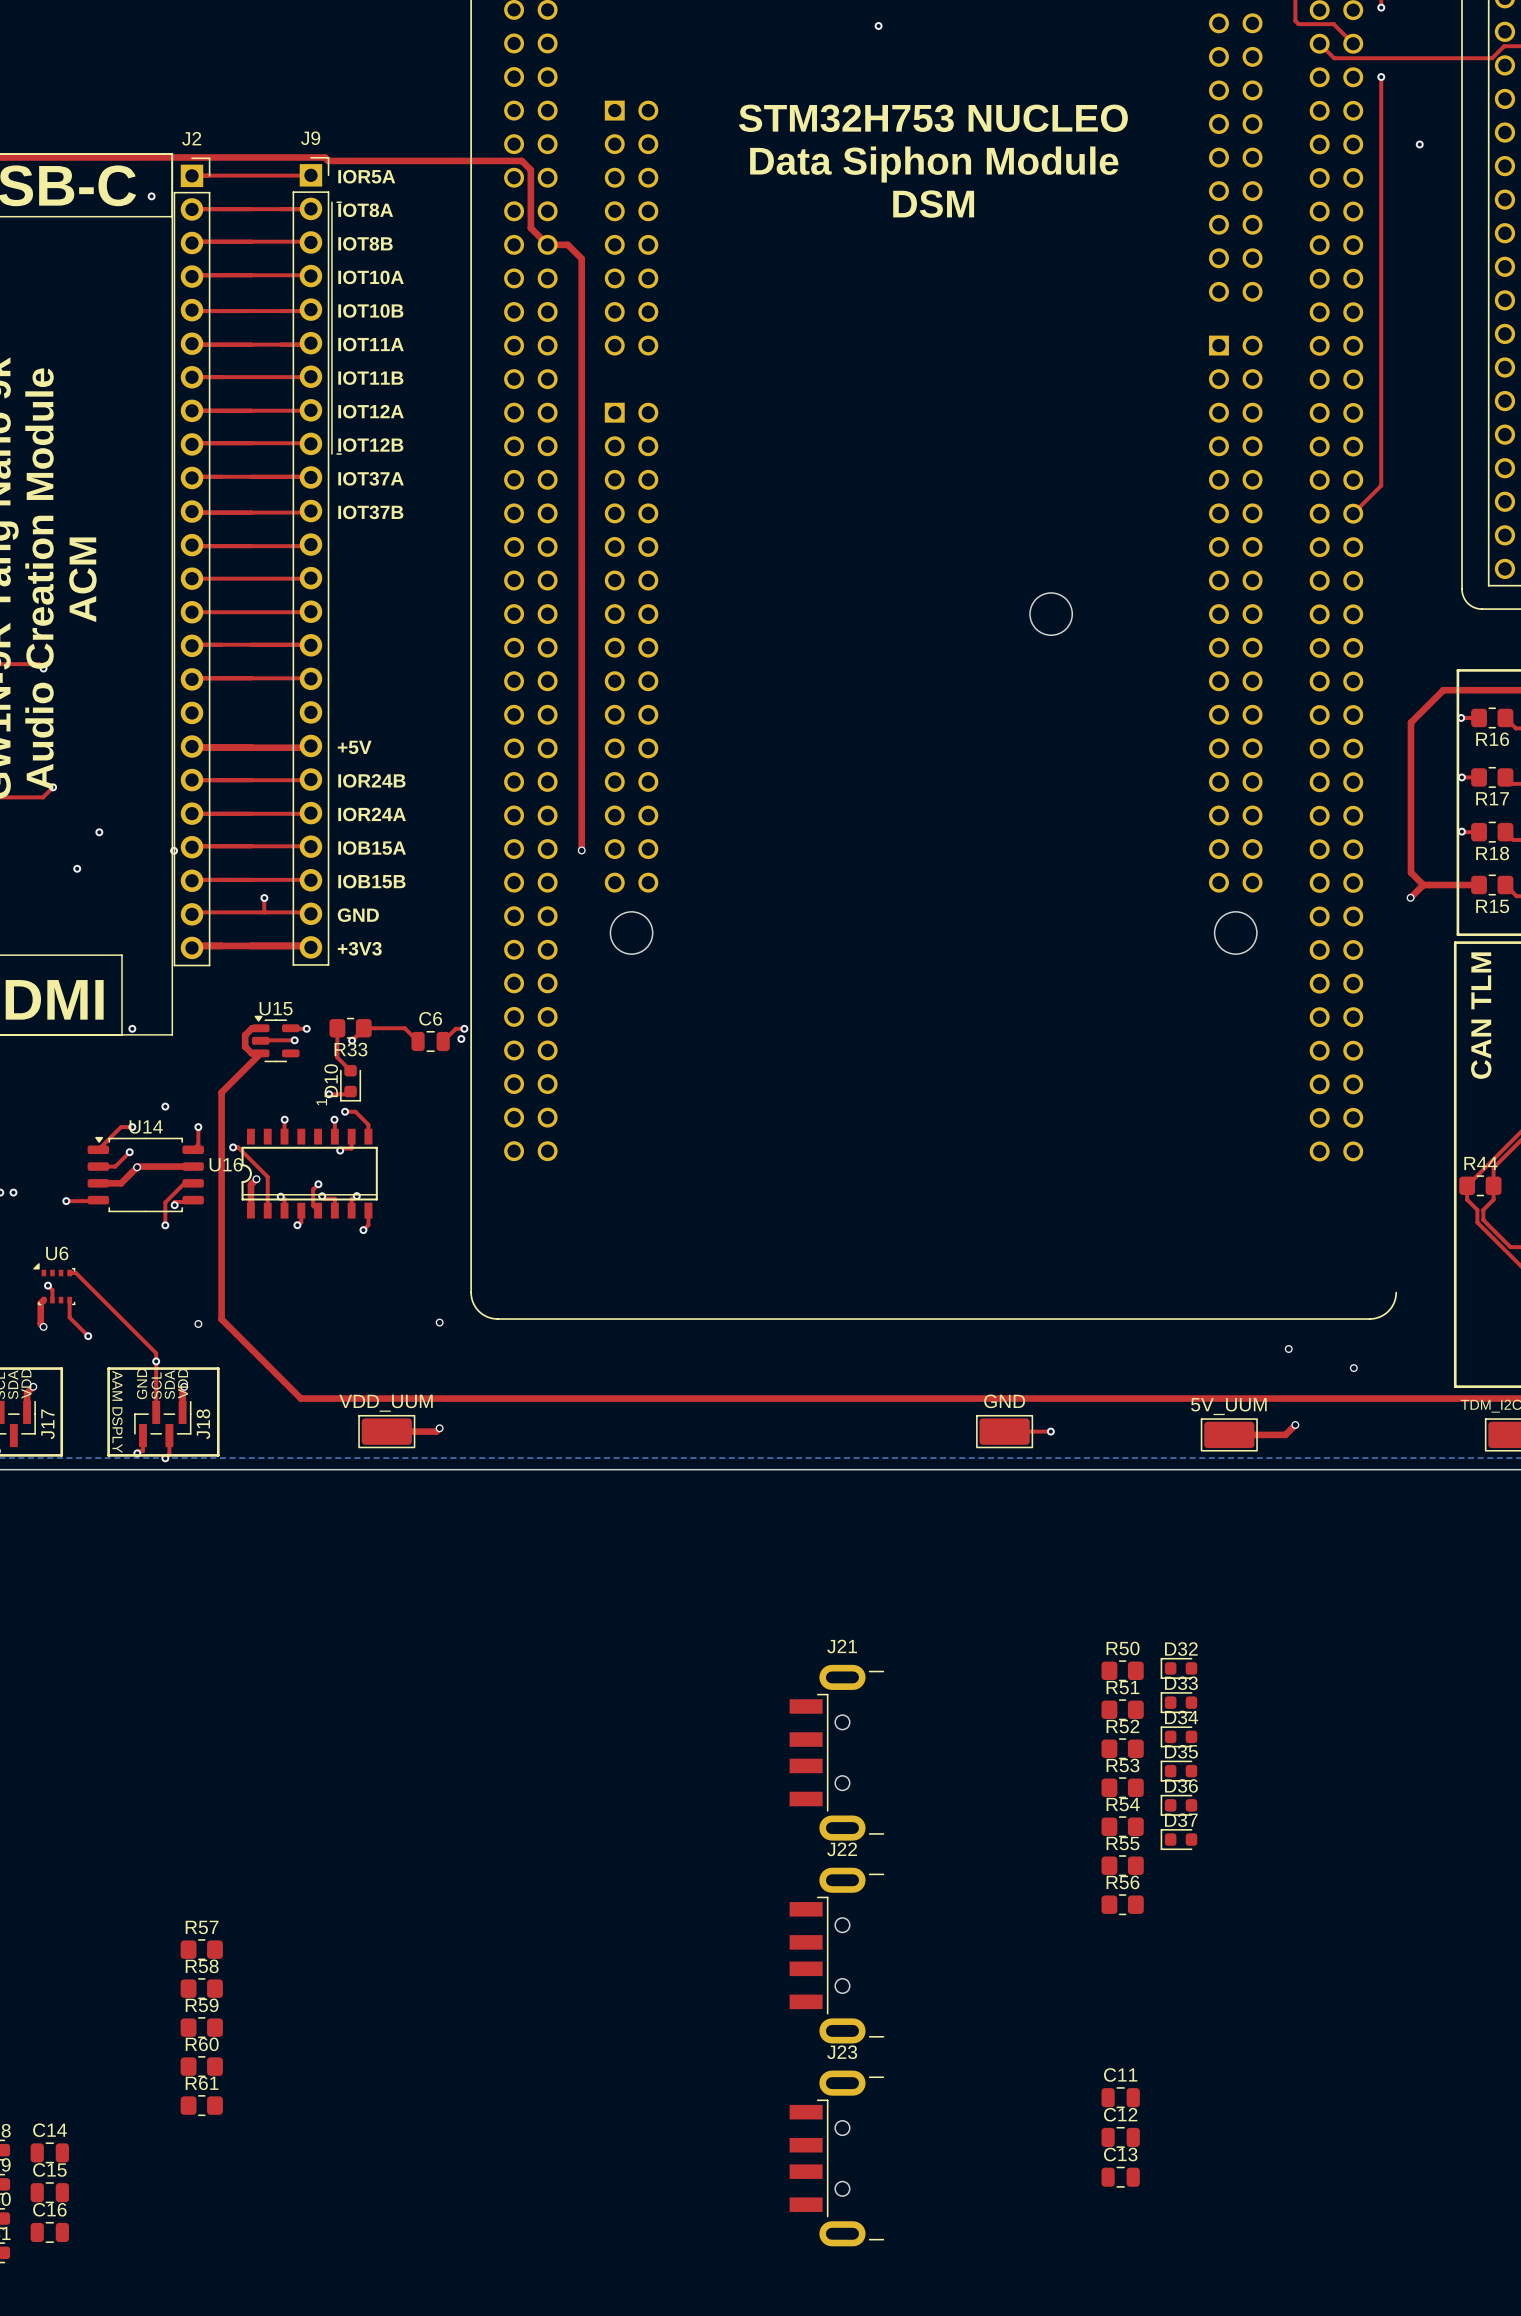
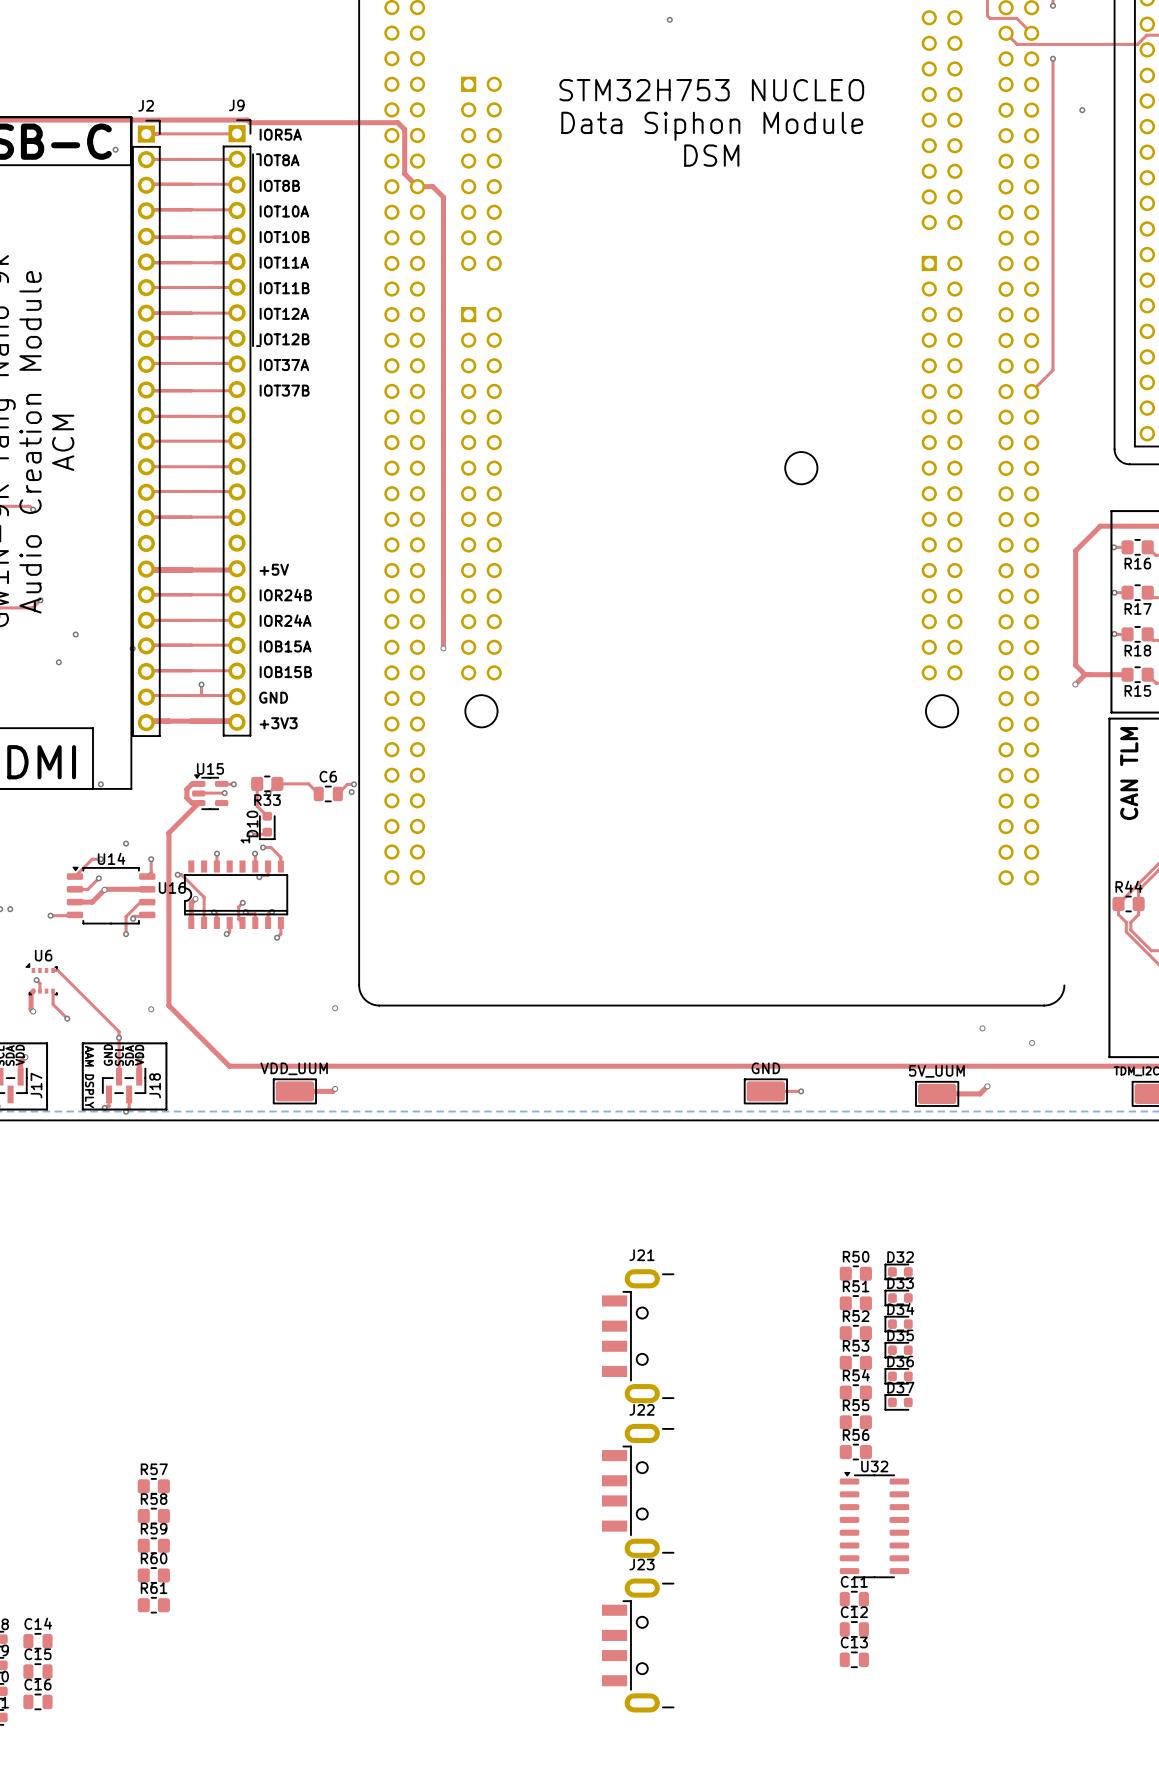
U32: none -> (874, 1524)

